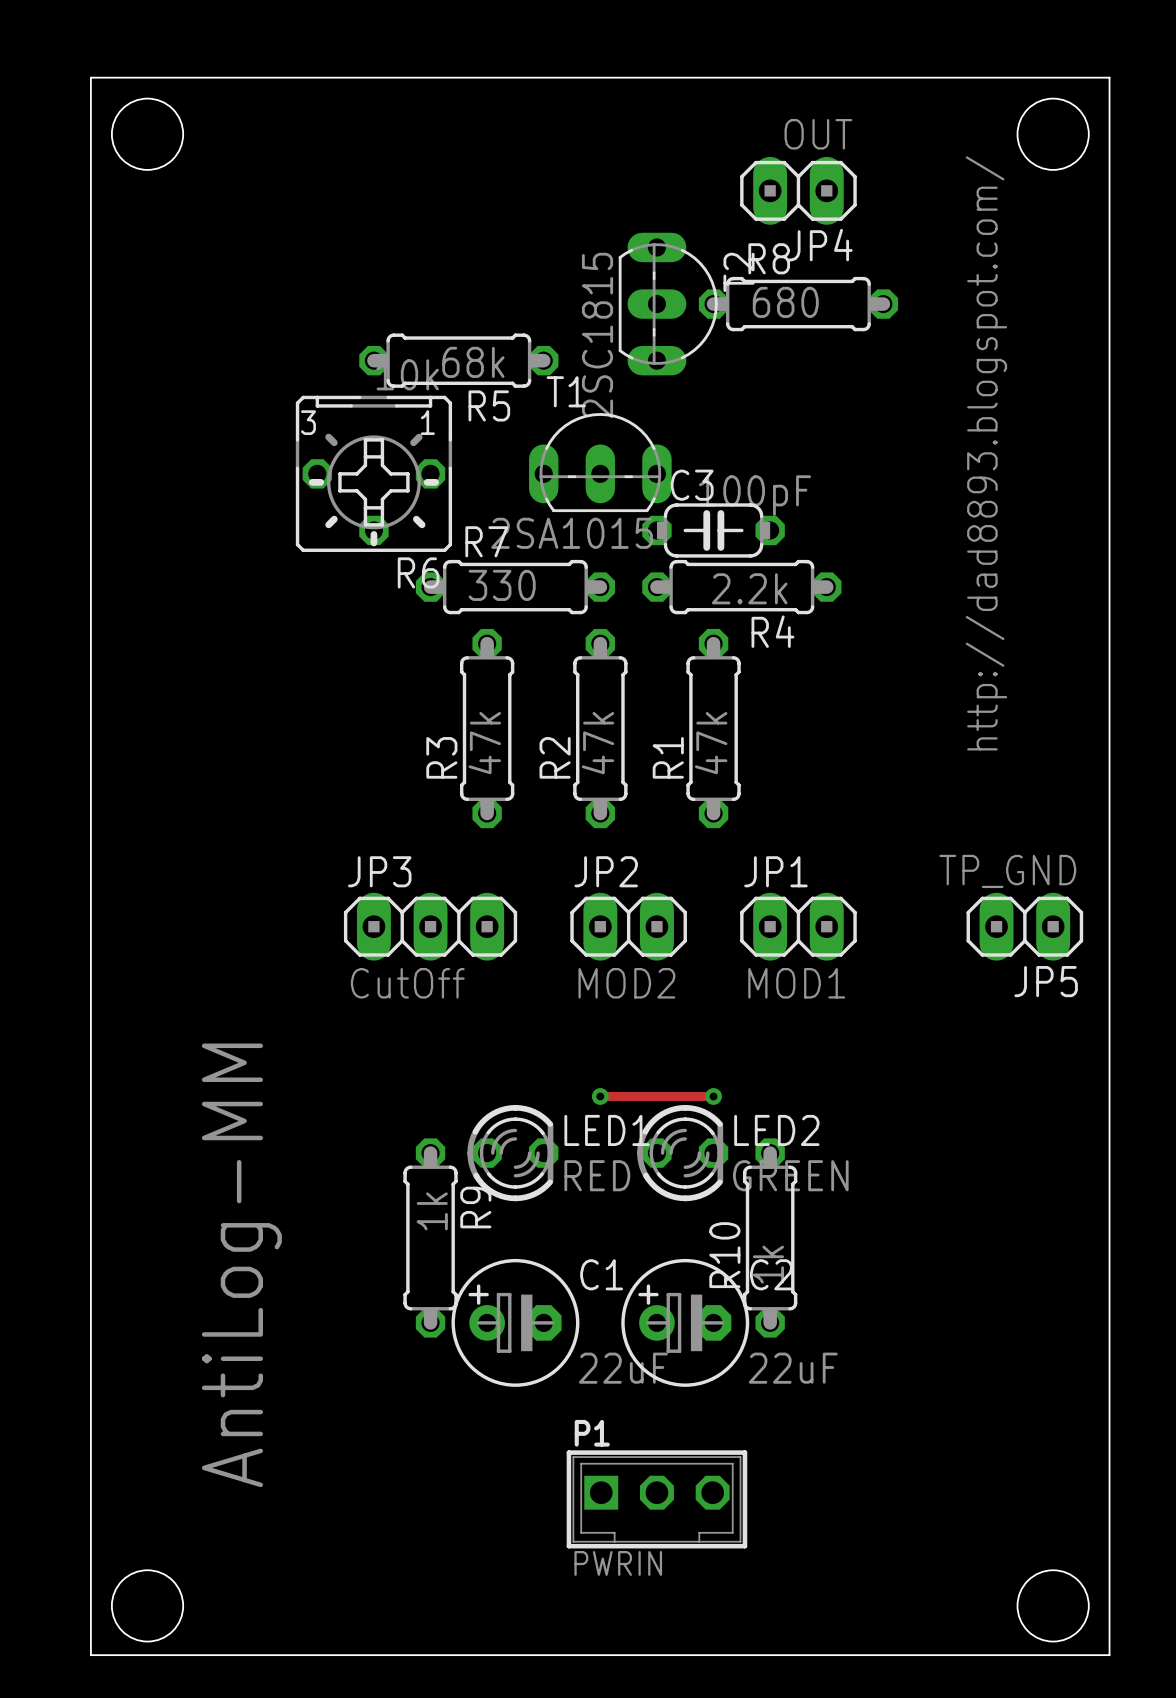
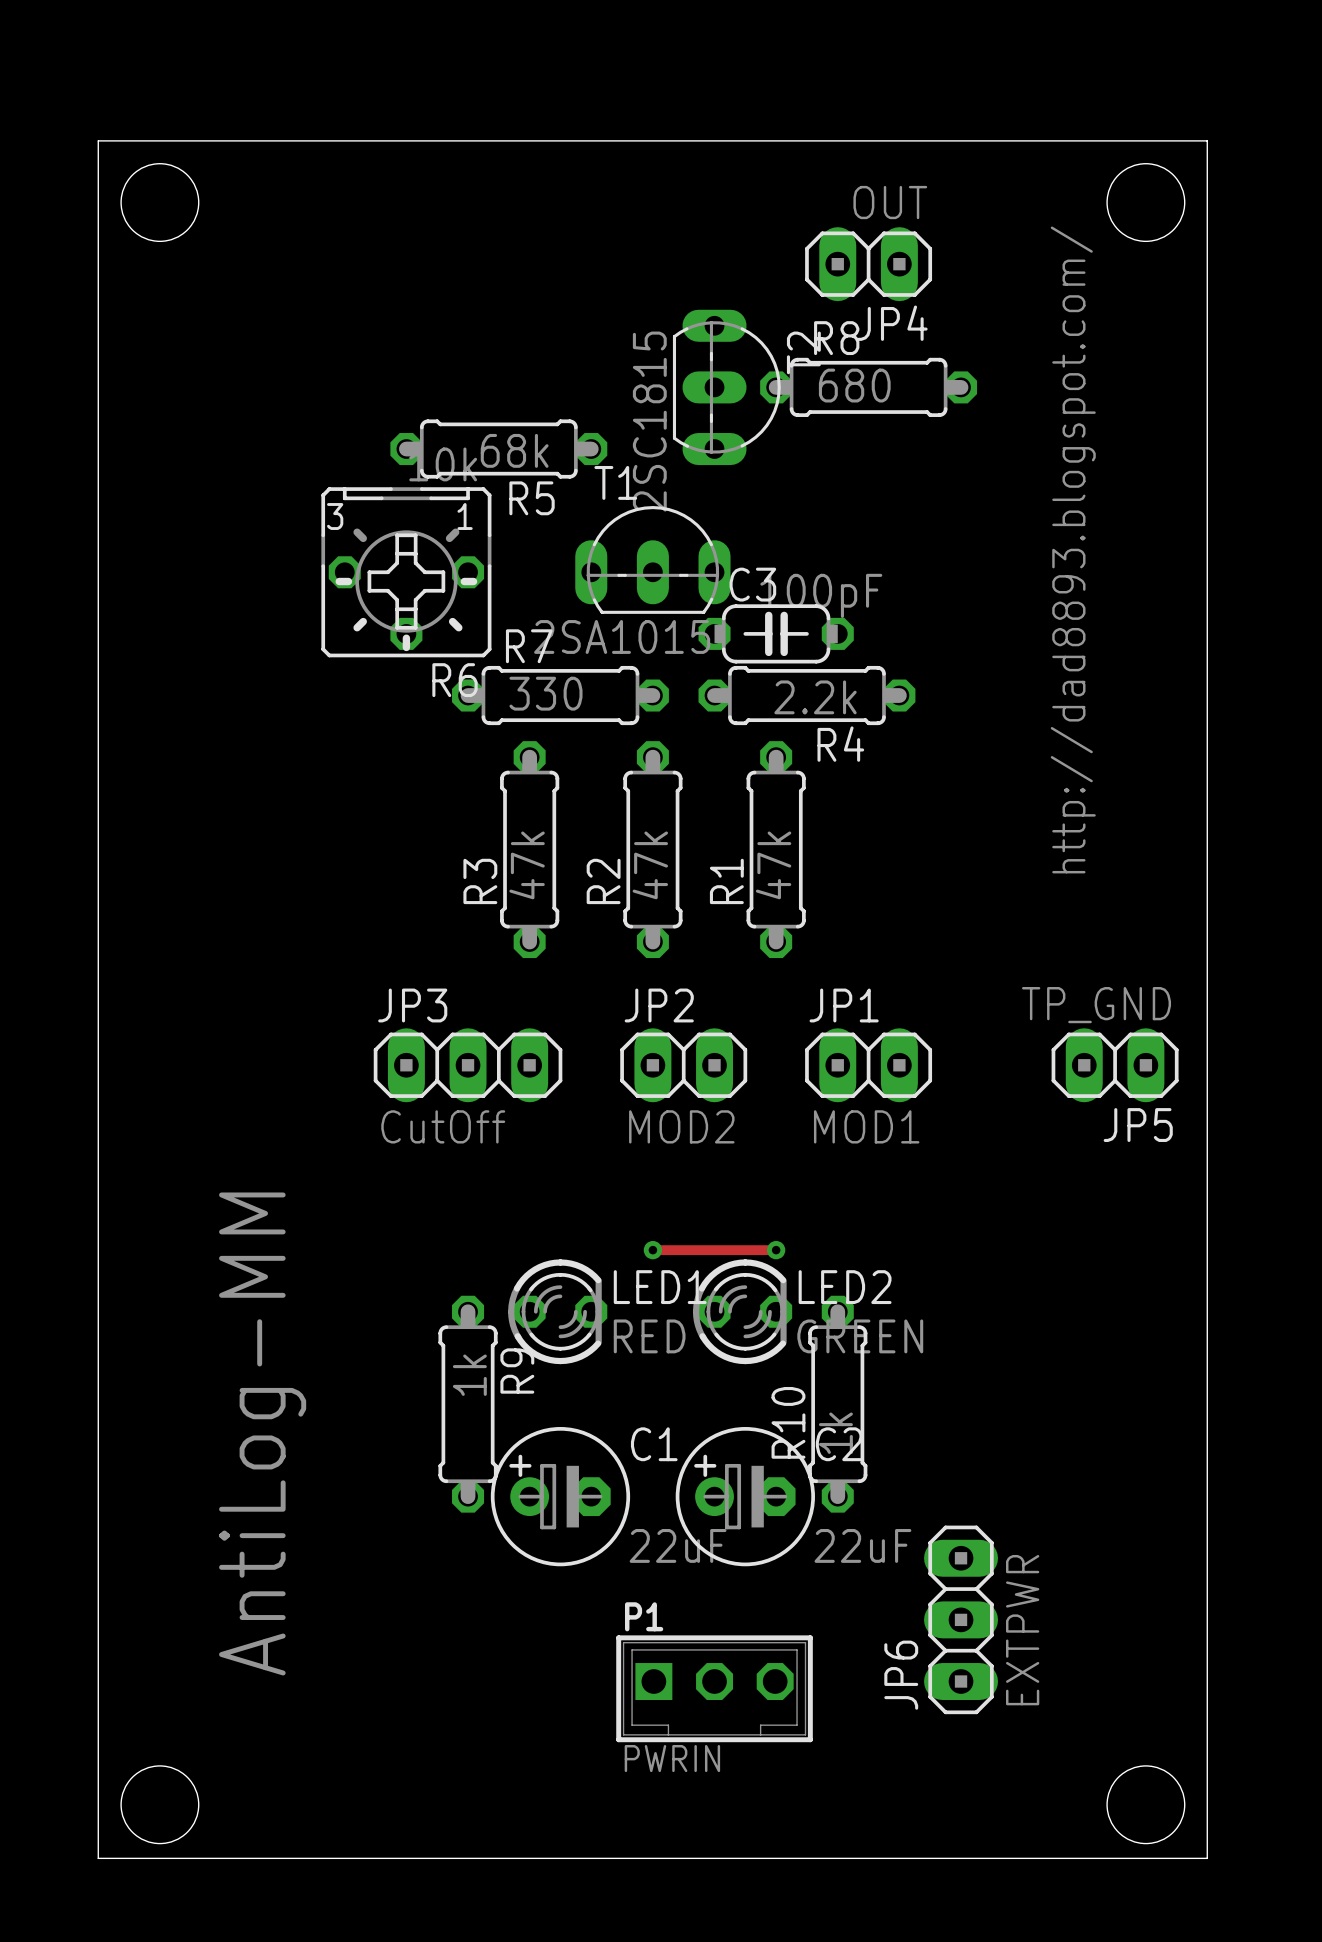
JP6: none -> EXTPWR (961, 1619)

